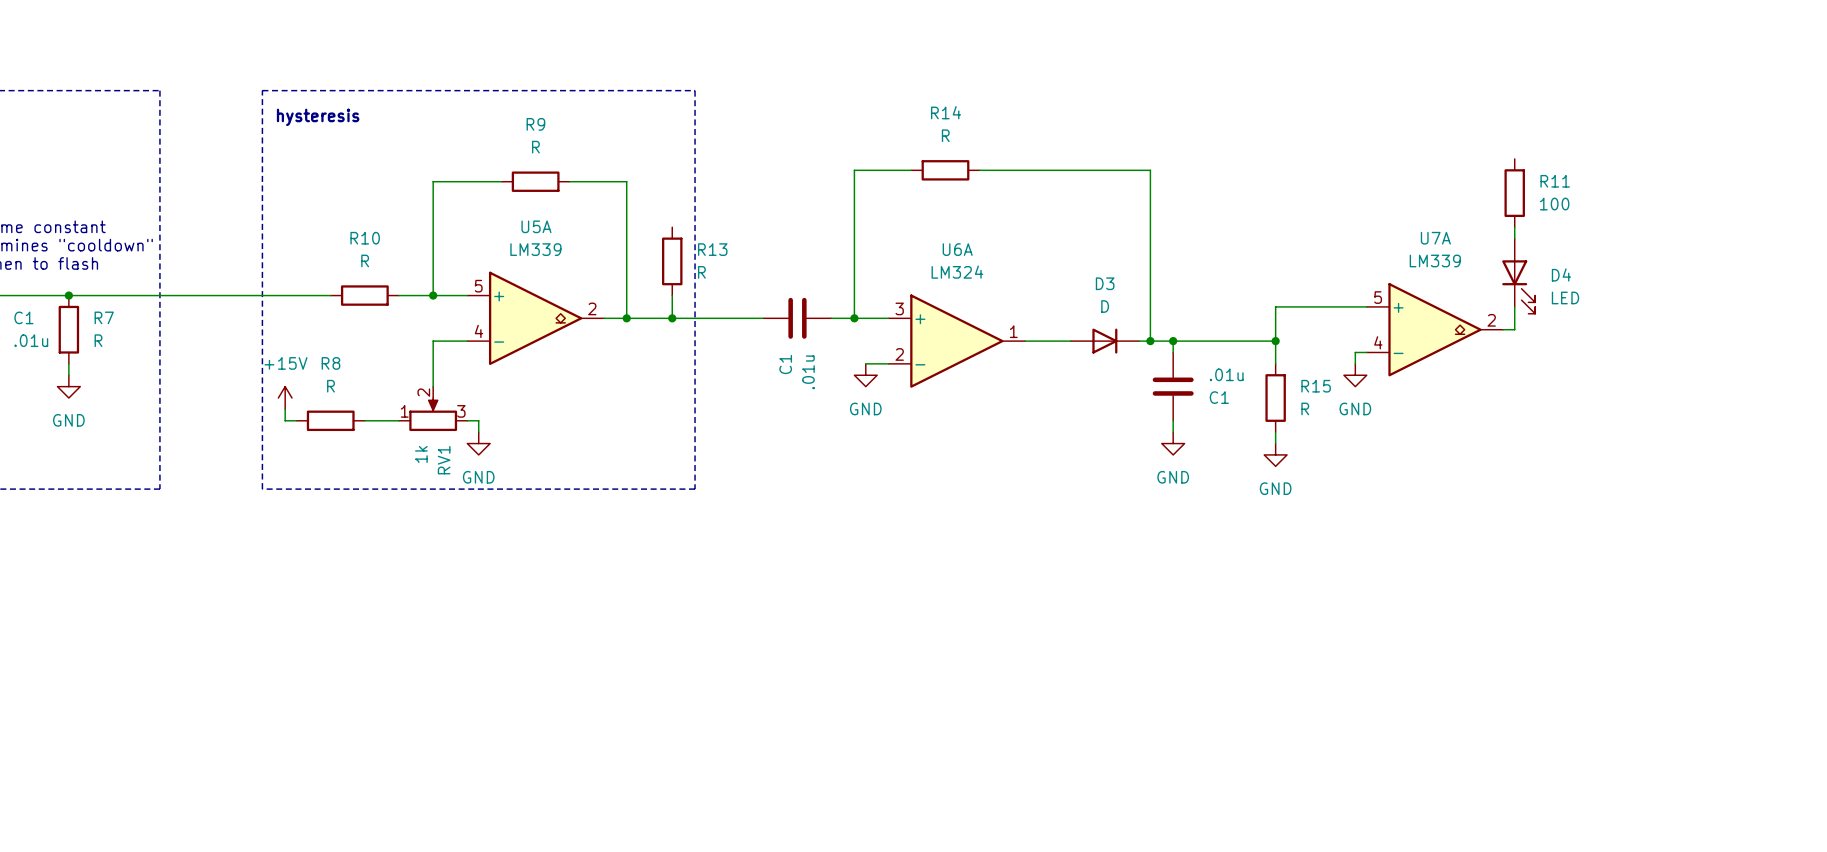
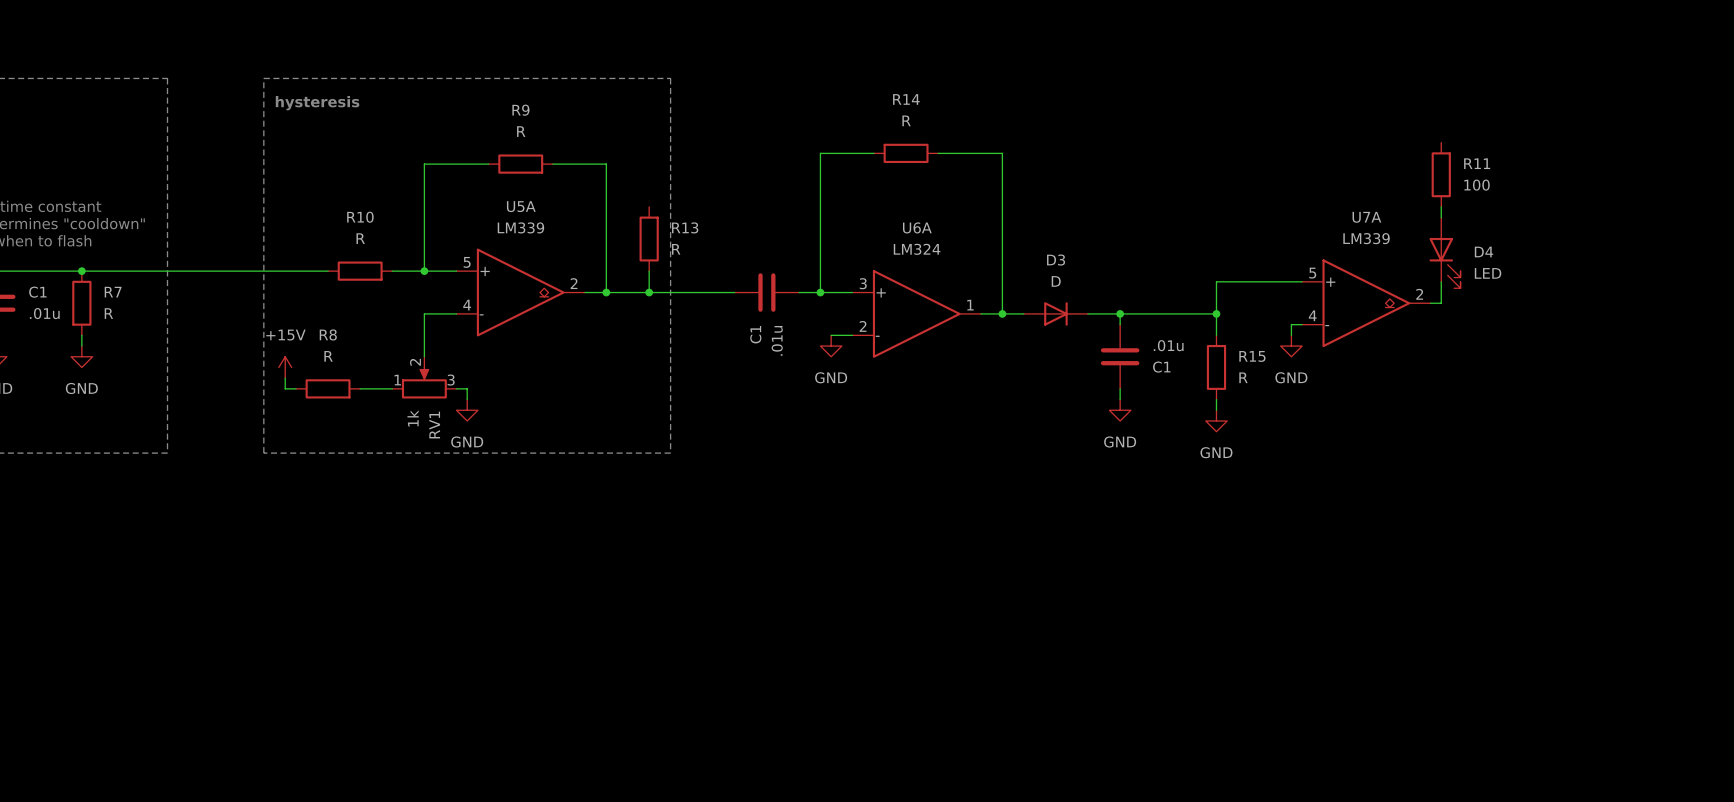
wire: (1047, 170) (1150, 170) (1150, 341) -> (1002, 153) (1002, 313)
junction: none -> (1002, 313)
junction: (1150, 341) -> none

